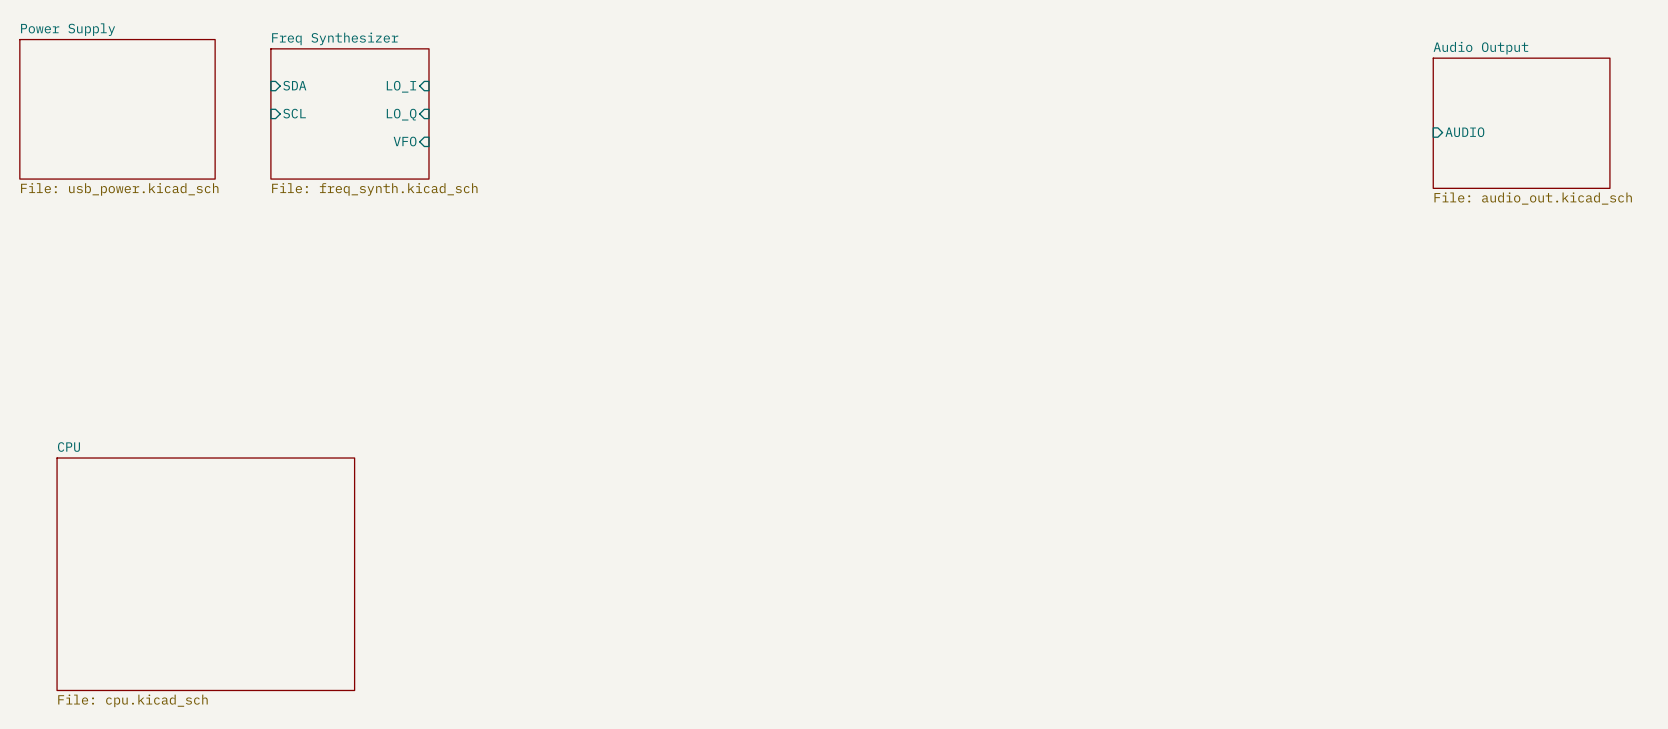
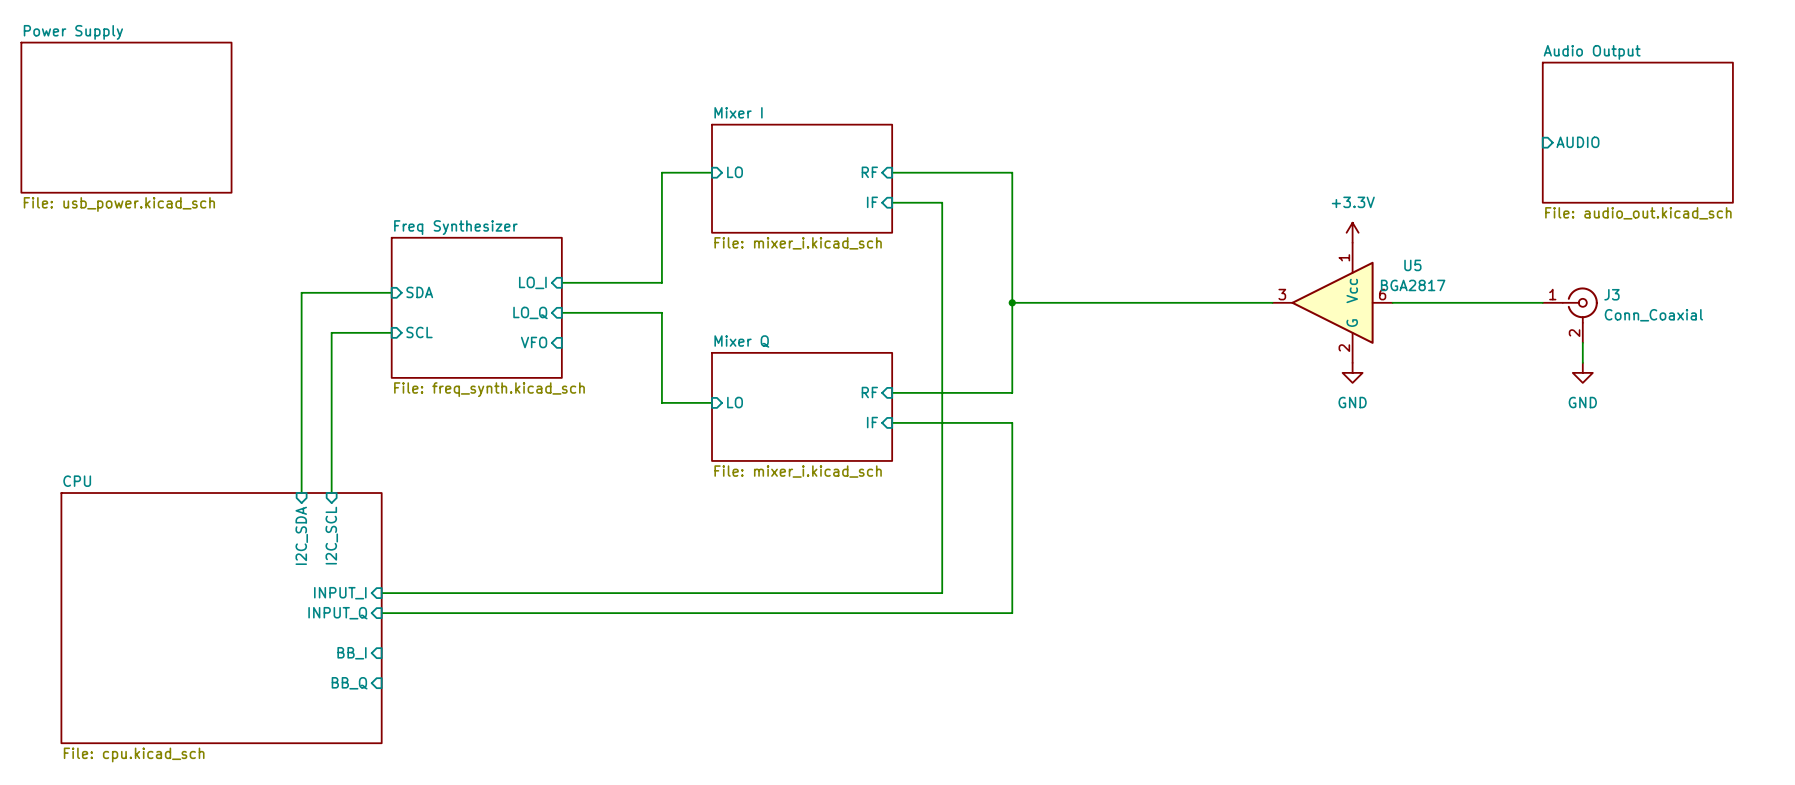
sheet pin: SDA (294, 85) -> none
sheet pin: LO_I (401, 86) -> none
sheet pin: SCL (294, 113) -> none
sheet Freq Synthesizer: File: freq_synth.kicad_sch (349, 113) -> none
sheet pin: LO_Q (401, 114) -> none
sheet pin: VFO (405, 141) -> none
wire: none -> (712, 172) (661, 172) (661, 282) (561, 282)
sheet pin: none -> LO (735, 172)
sheet pin: none -> RF (869, 172)
wire: none -> (892, 172) (1012, 172) (1012, 392) (892, 392)
sheet Mixer I: none -> File: mixer_i.kicad_sch (802, 178)
sheet pin: none -> IF (872, 202)
wire: none -> (892, 202) (942, 202) (942, 593) (381, 593)
power symbol: none -> +3.3V (1352, 232)
sheet pin: none -> LO_I (532, 282)
sheet pin: none -> SDA (419, 292)
wire: none -> (391, 292) (301, 292) (301, 493)
wire: none -> (1012, 302) (1272, 302)
junction: none -> (1012, 302)
U5: none -> BGA2817 (1332, 302)
wire: none -> (1392, 302) (1542, 302)
sheet Freq Synthesizer: none -> File: freq_synth.kicad_sch (476, 307)
wire: none -> (561, 312) (661, 312) (661, 402) (712, 402)
sheet pin: none -> LO_Q (530, 312)
J3: none -> Conn_Coaxial (1570, 315)
sheet pin: none -> SCL (419, 332)
wire: none -> (391, 332) (331, 332) (331, 493)
sheet pin: none -> VFO (534, 342)
wire: none -> (1582, 342) (1582, 362)
power symbol: none -> GND (1352, 372)
power symbol: none -> GND (1582, 372)
sheet pin: none -> RF (869, 392)
sheet pin: none -> LO (735, 402)
sheet Mixer Q: none -> File: mixer_i.kicad_sch (802, 406)
sheet pin: none -> IF (872, 422)
wire: none -> (892, 422) (1012, 422) (1012, 613) (381, 613)
sheet pin: none -> I2C_SDA (301, 535)
sheet pin: none -> I2C_SCL (331, 535)
sheet pin: none -> INPUT_I (340, 593)
sheet pin: none -> INPUT_Q (337, 613)
sheet pin: none -> BB_I (351, 653)
sheet pin: none -> BB_Q (349, 683)

